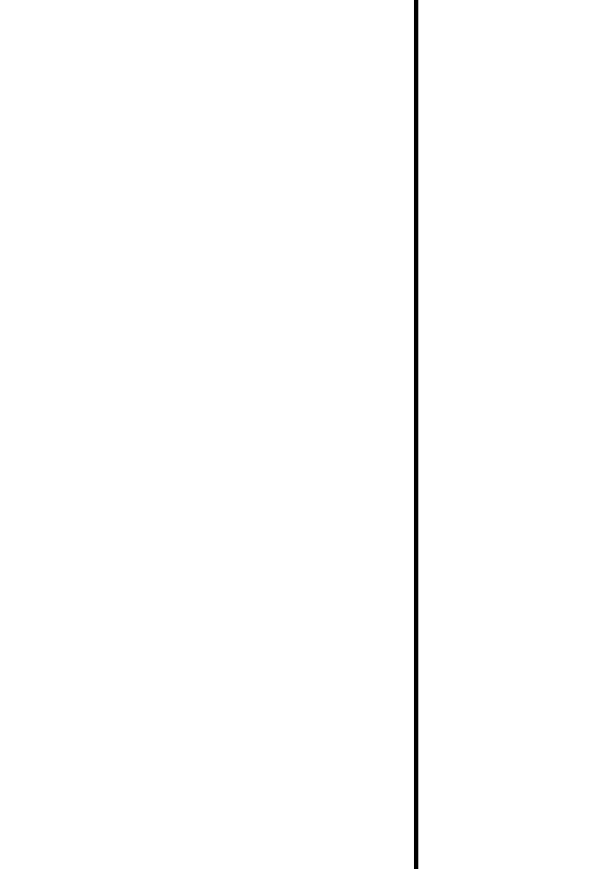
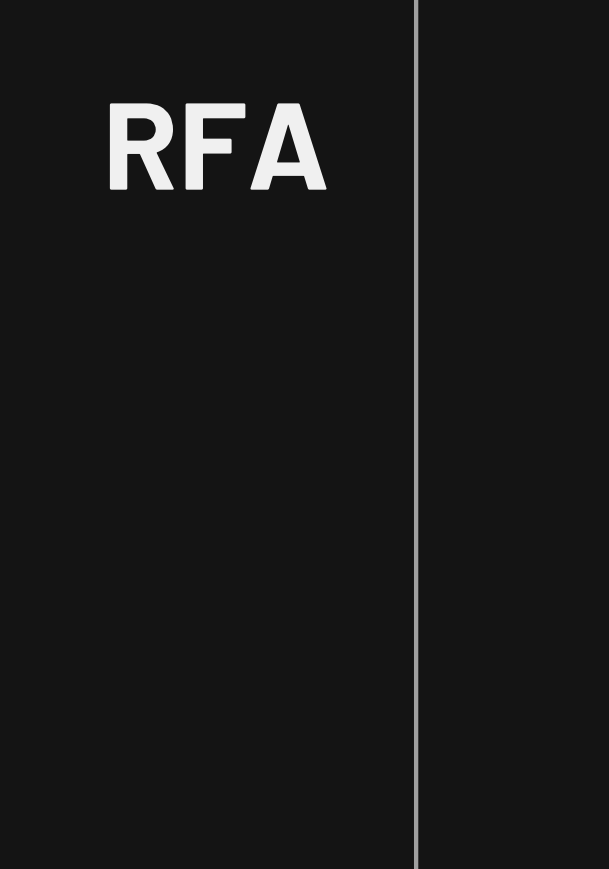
text: none -> RFA (218, 146)

